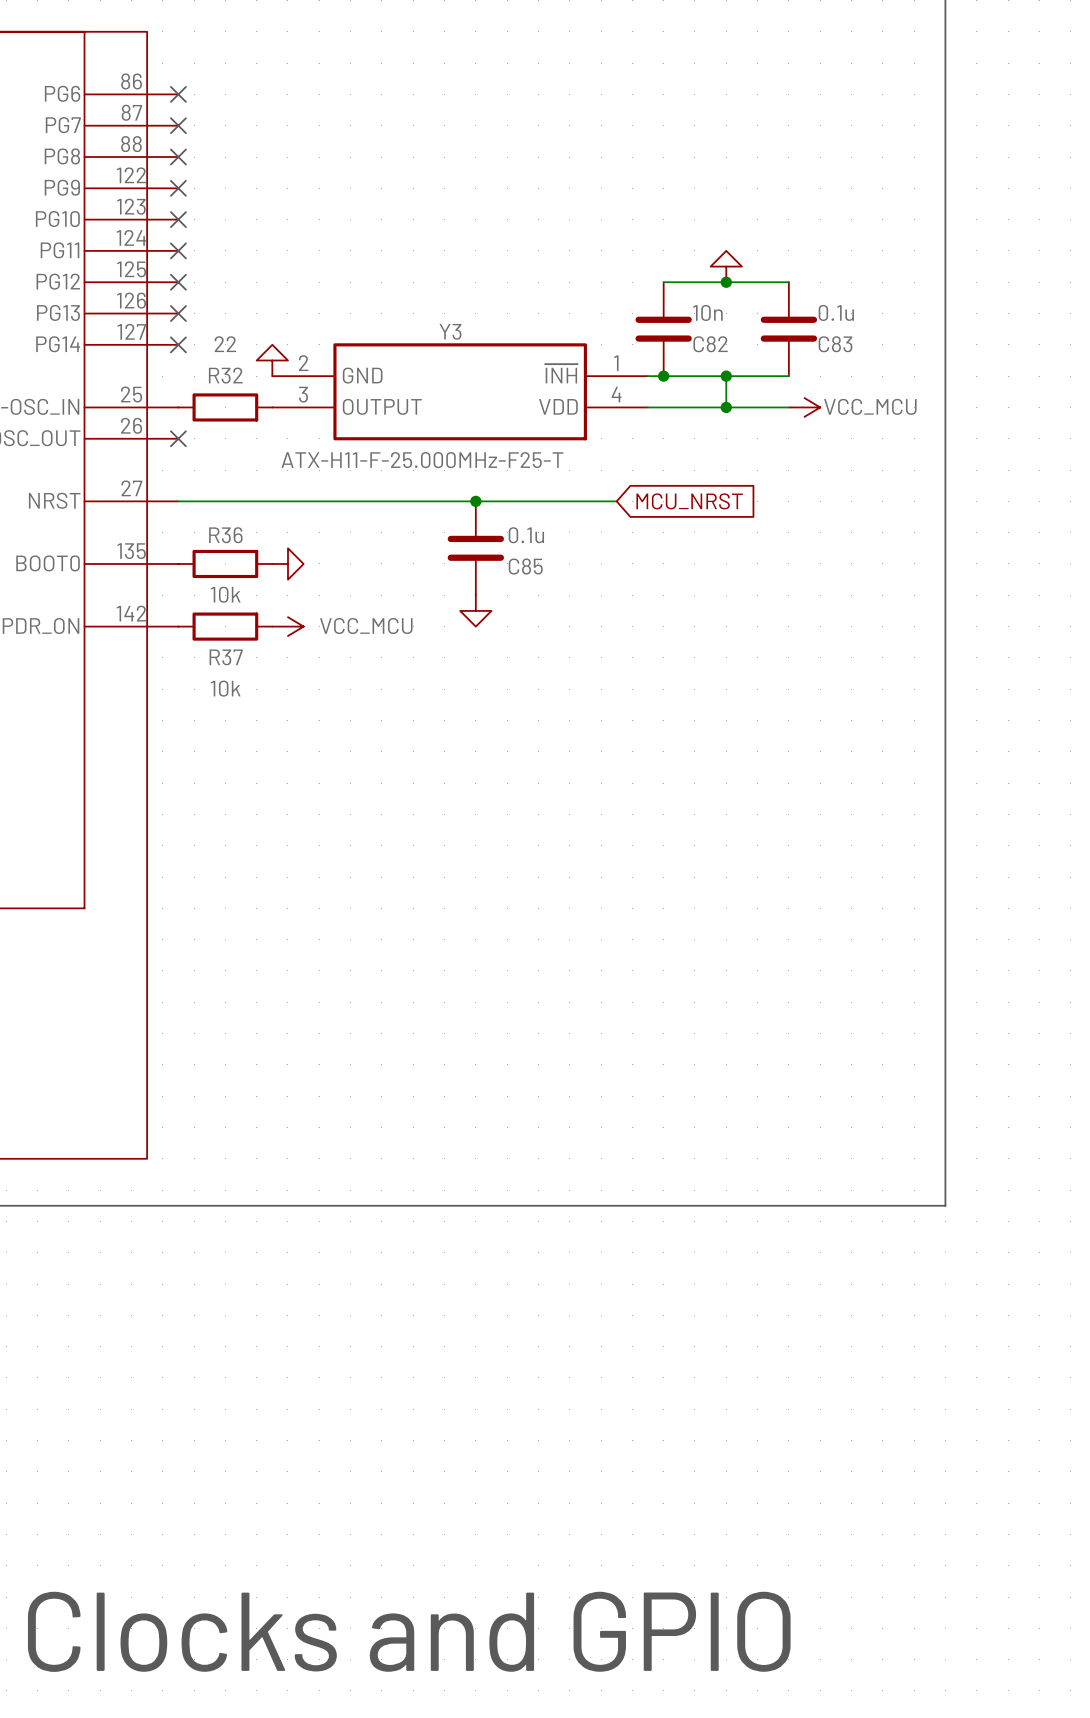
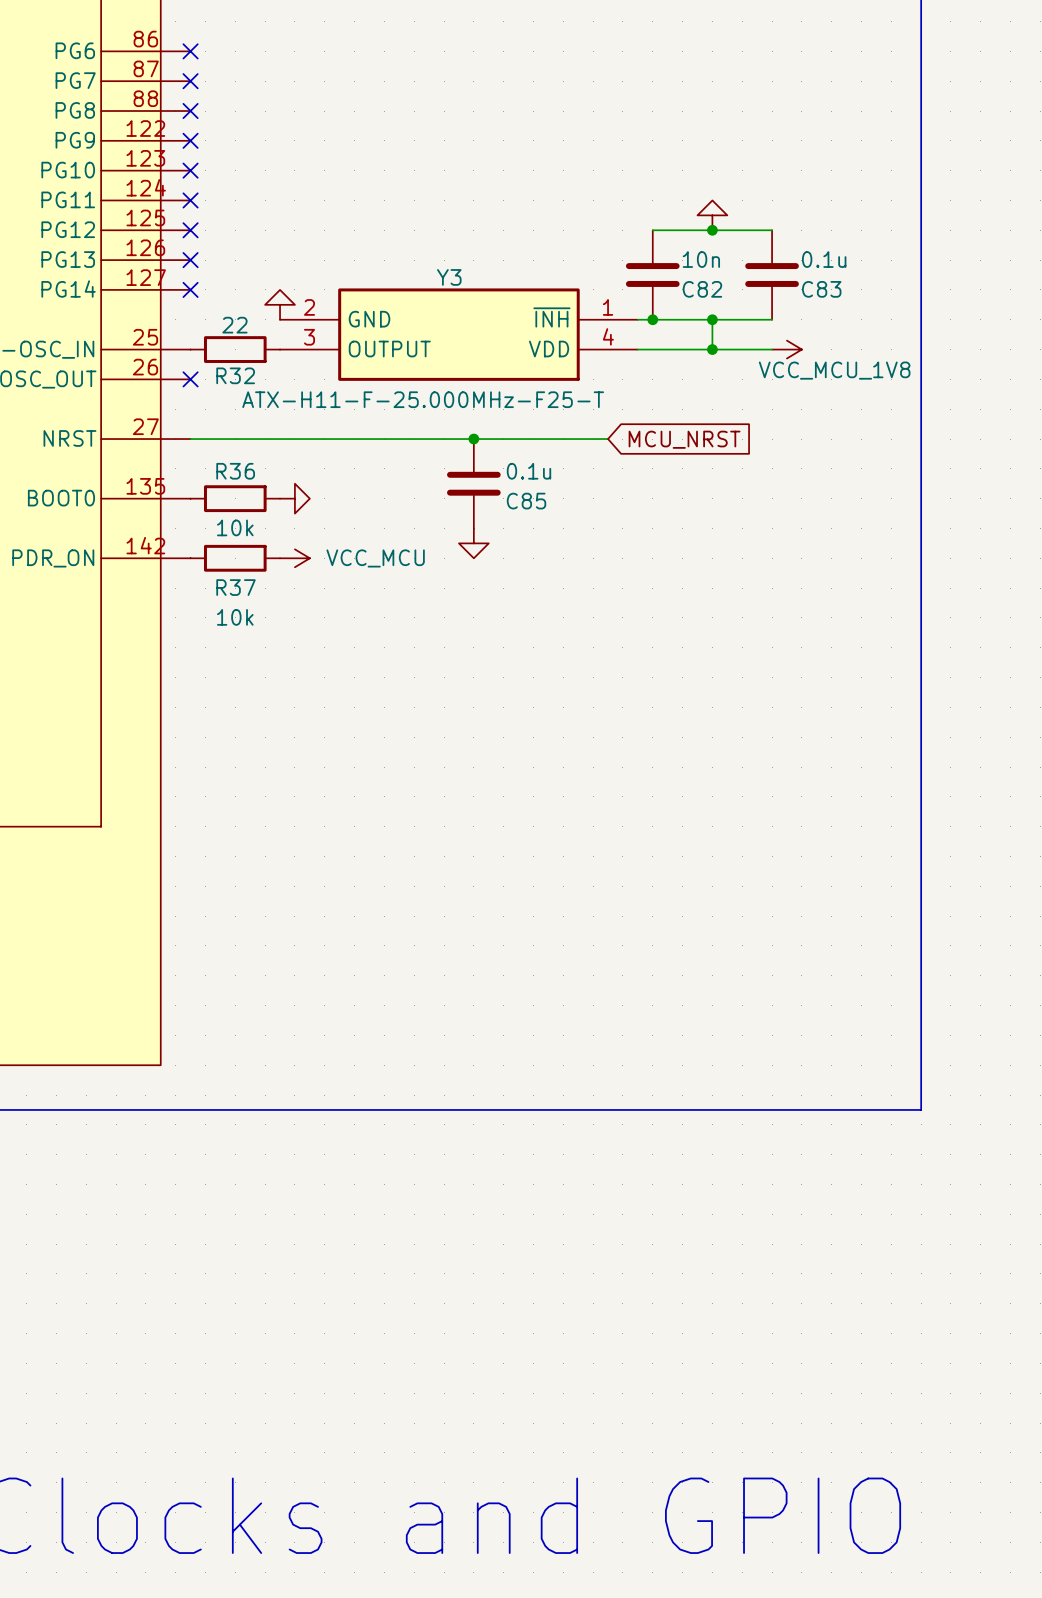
R32 value position: 22 (225, 344) -> 22 (234, 325)
R32 name position: R32 (225, 375) -> R32 (235, 375)
power symbol: VCC_MCU (804, 407) -> VCC_MCU_1V8 (786, 349)

